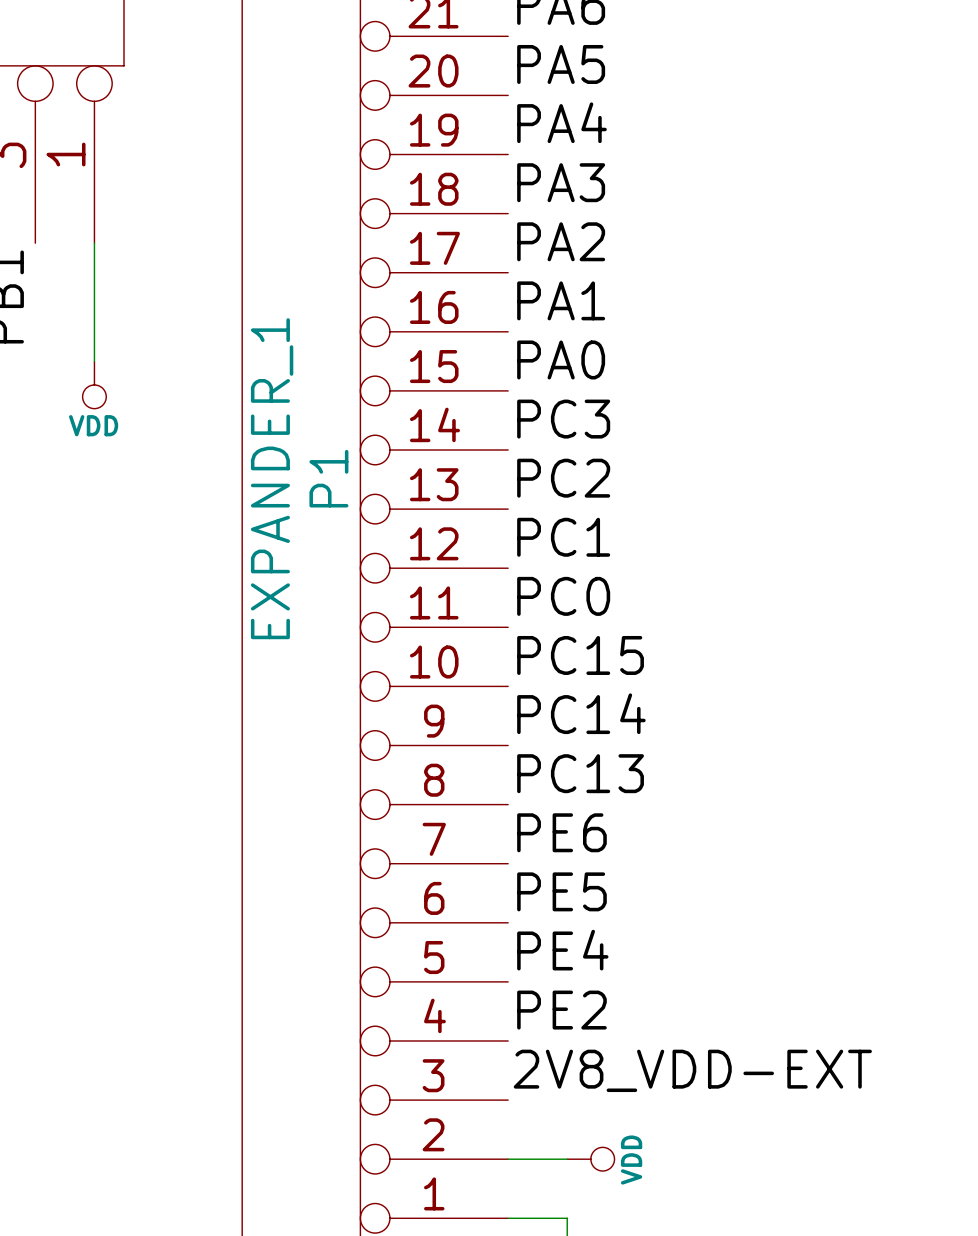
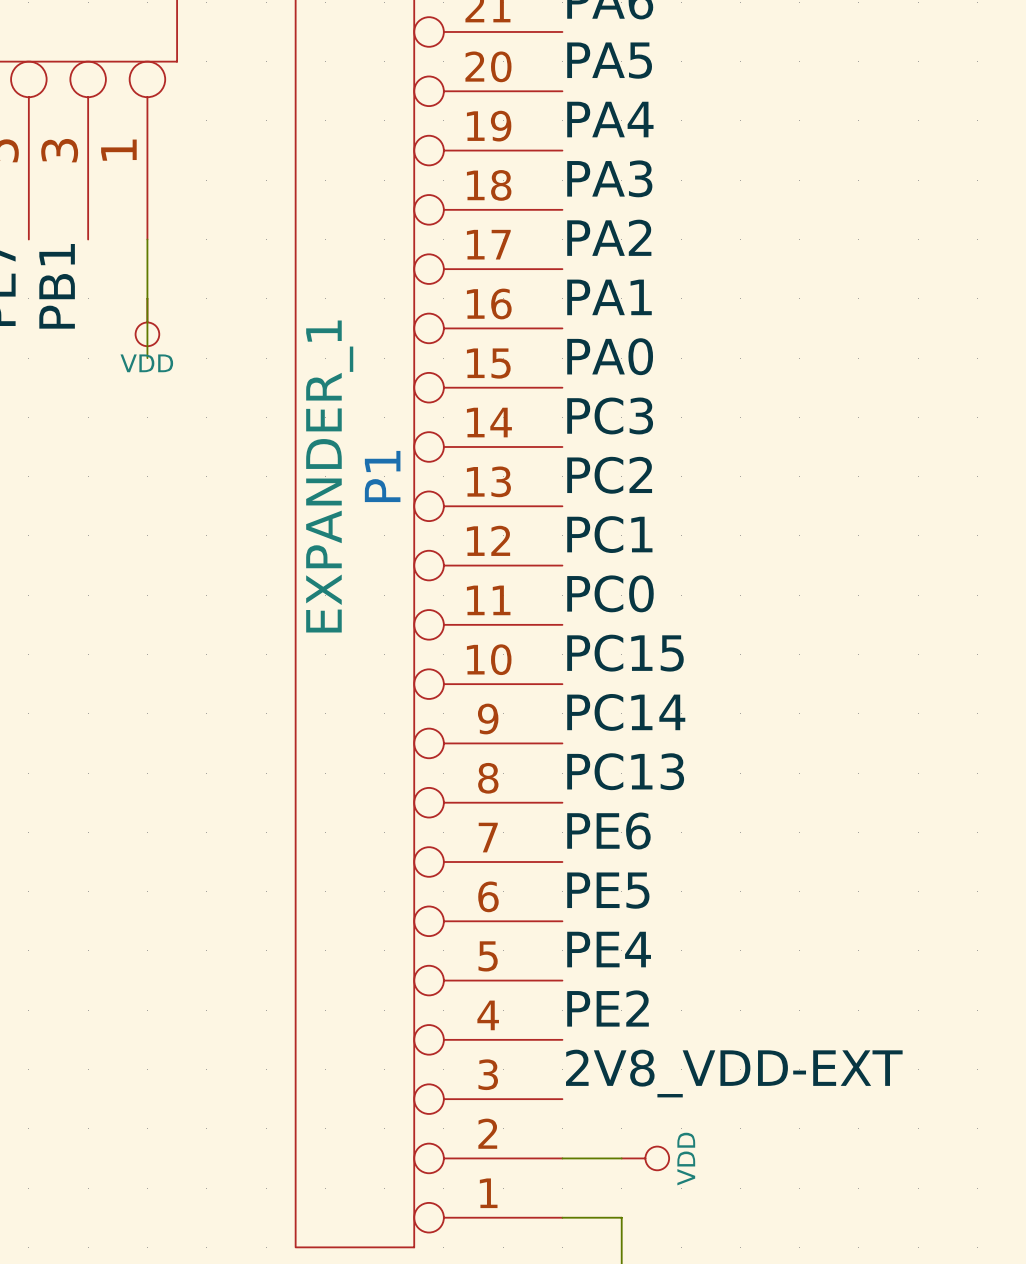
power symbol position: VDD (94, 385) -> VDD (147, 322)

